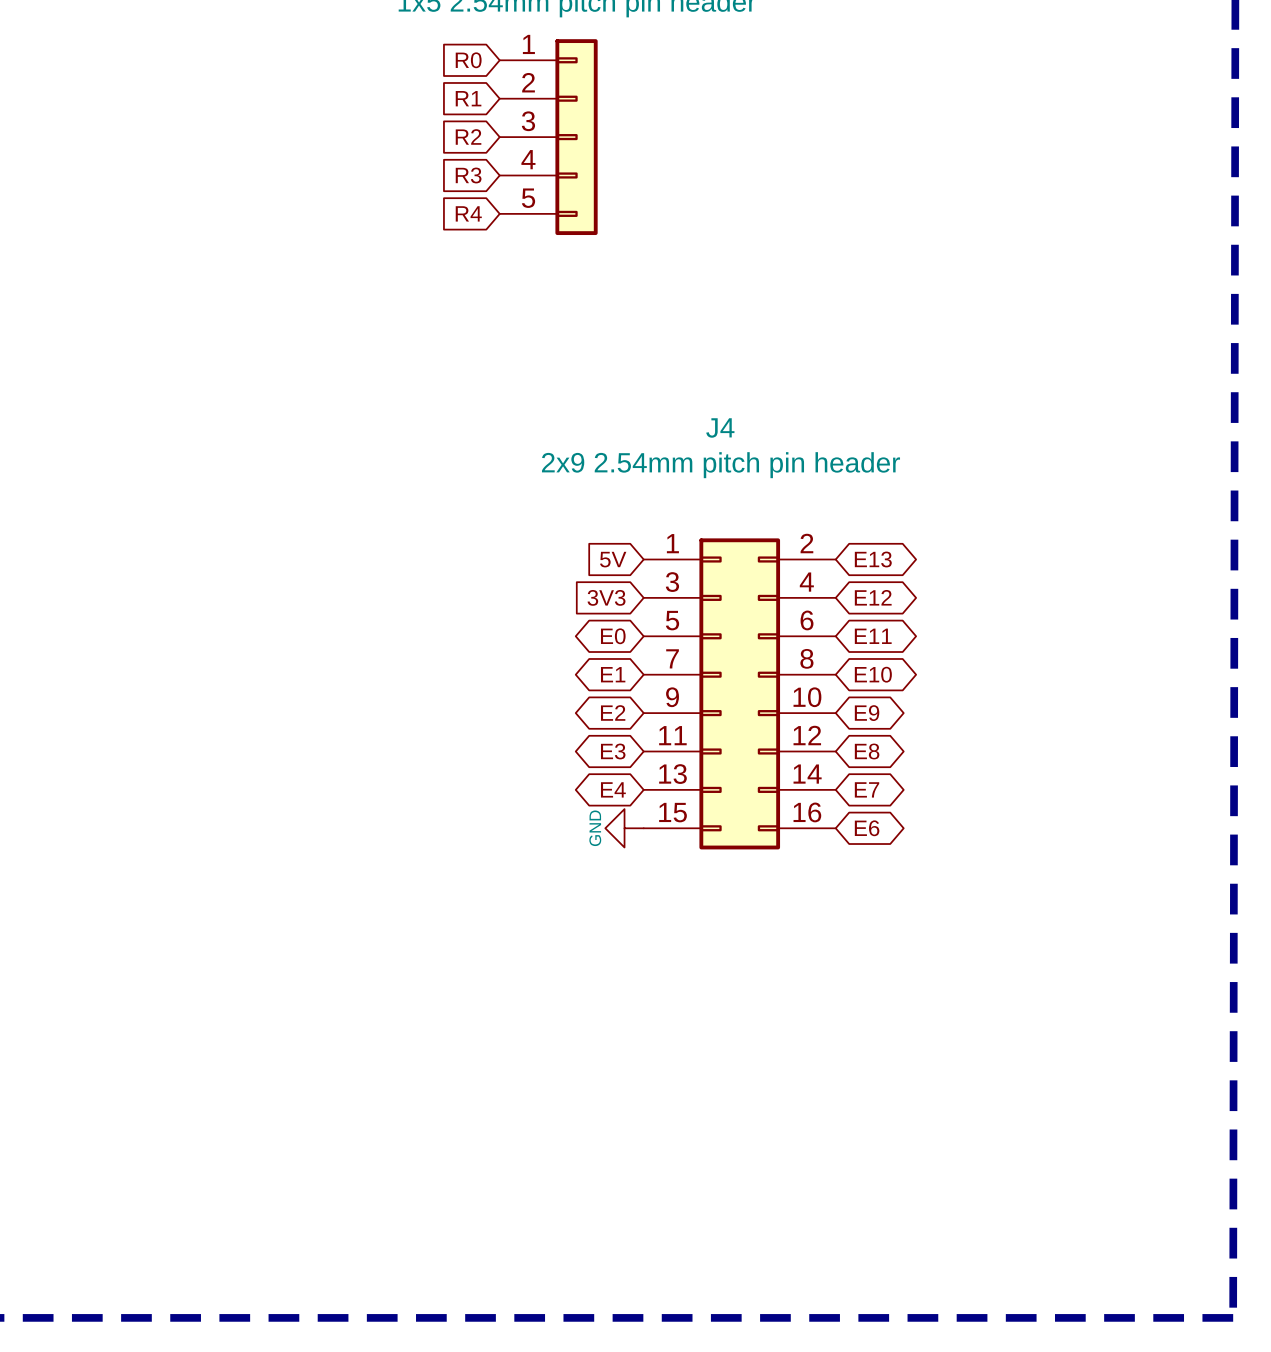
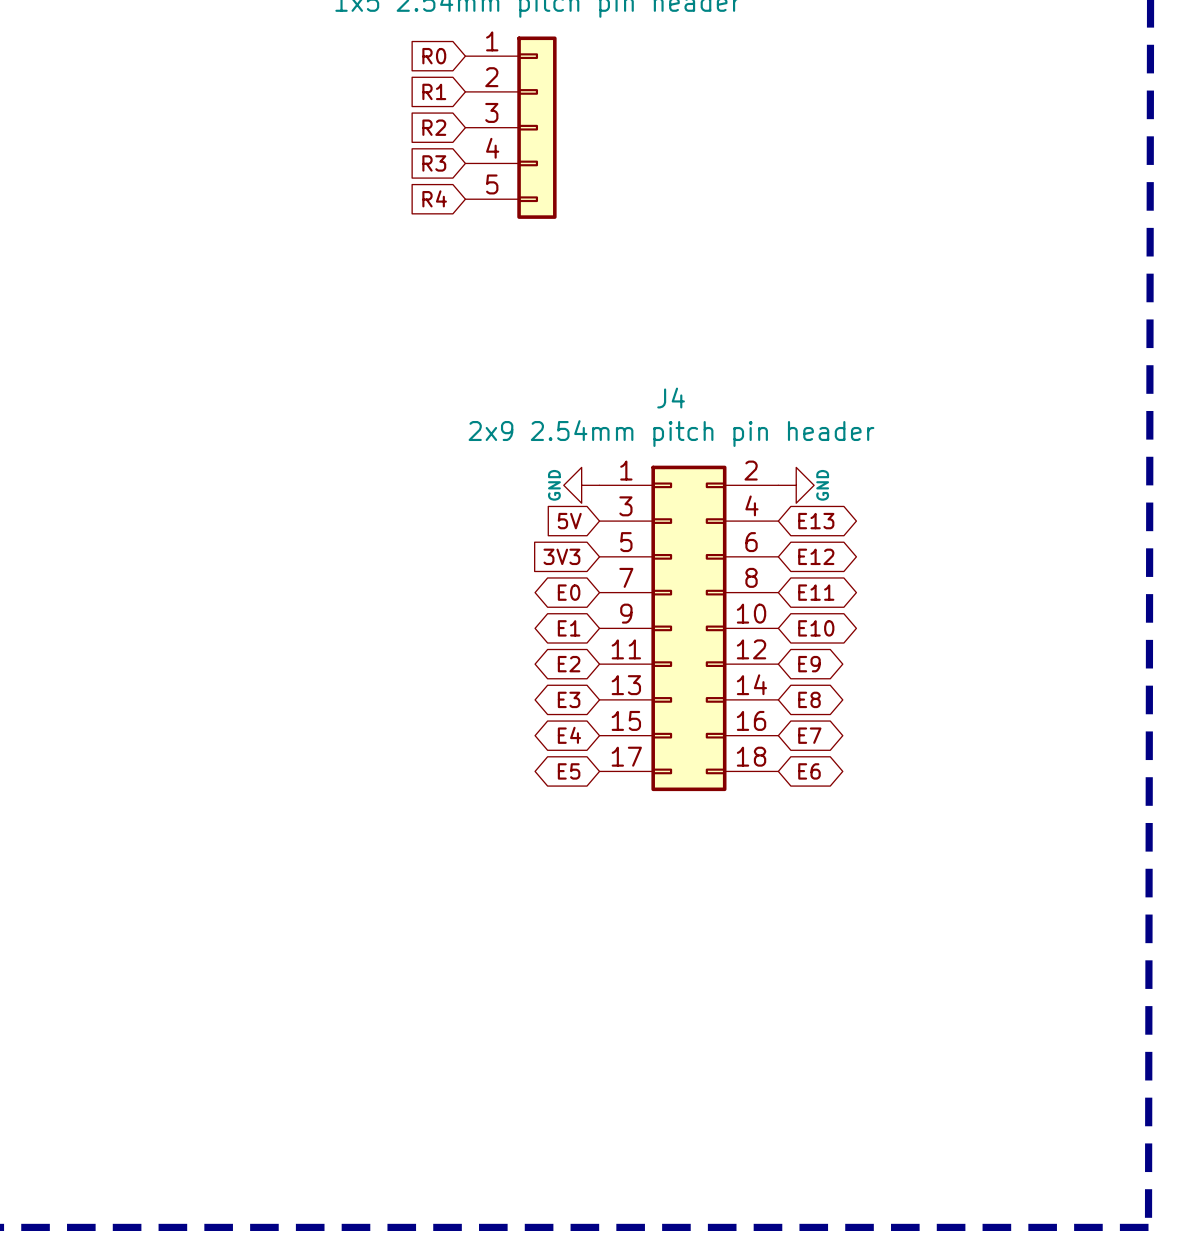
power symbol: none -> GND (581, 485)
power symbol: none -> GND (796, 485)
J4 symbol: [643, 538, 836, 850] -> [599, 465, 779, 792]
global label: none -> E5 (569, 771)
power symbol: GND (624, 828) -> none

